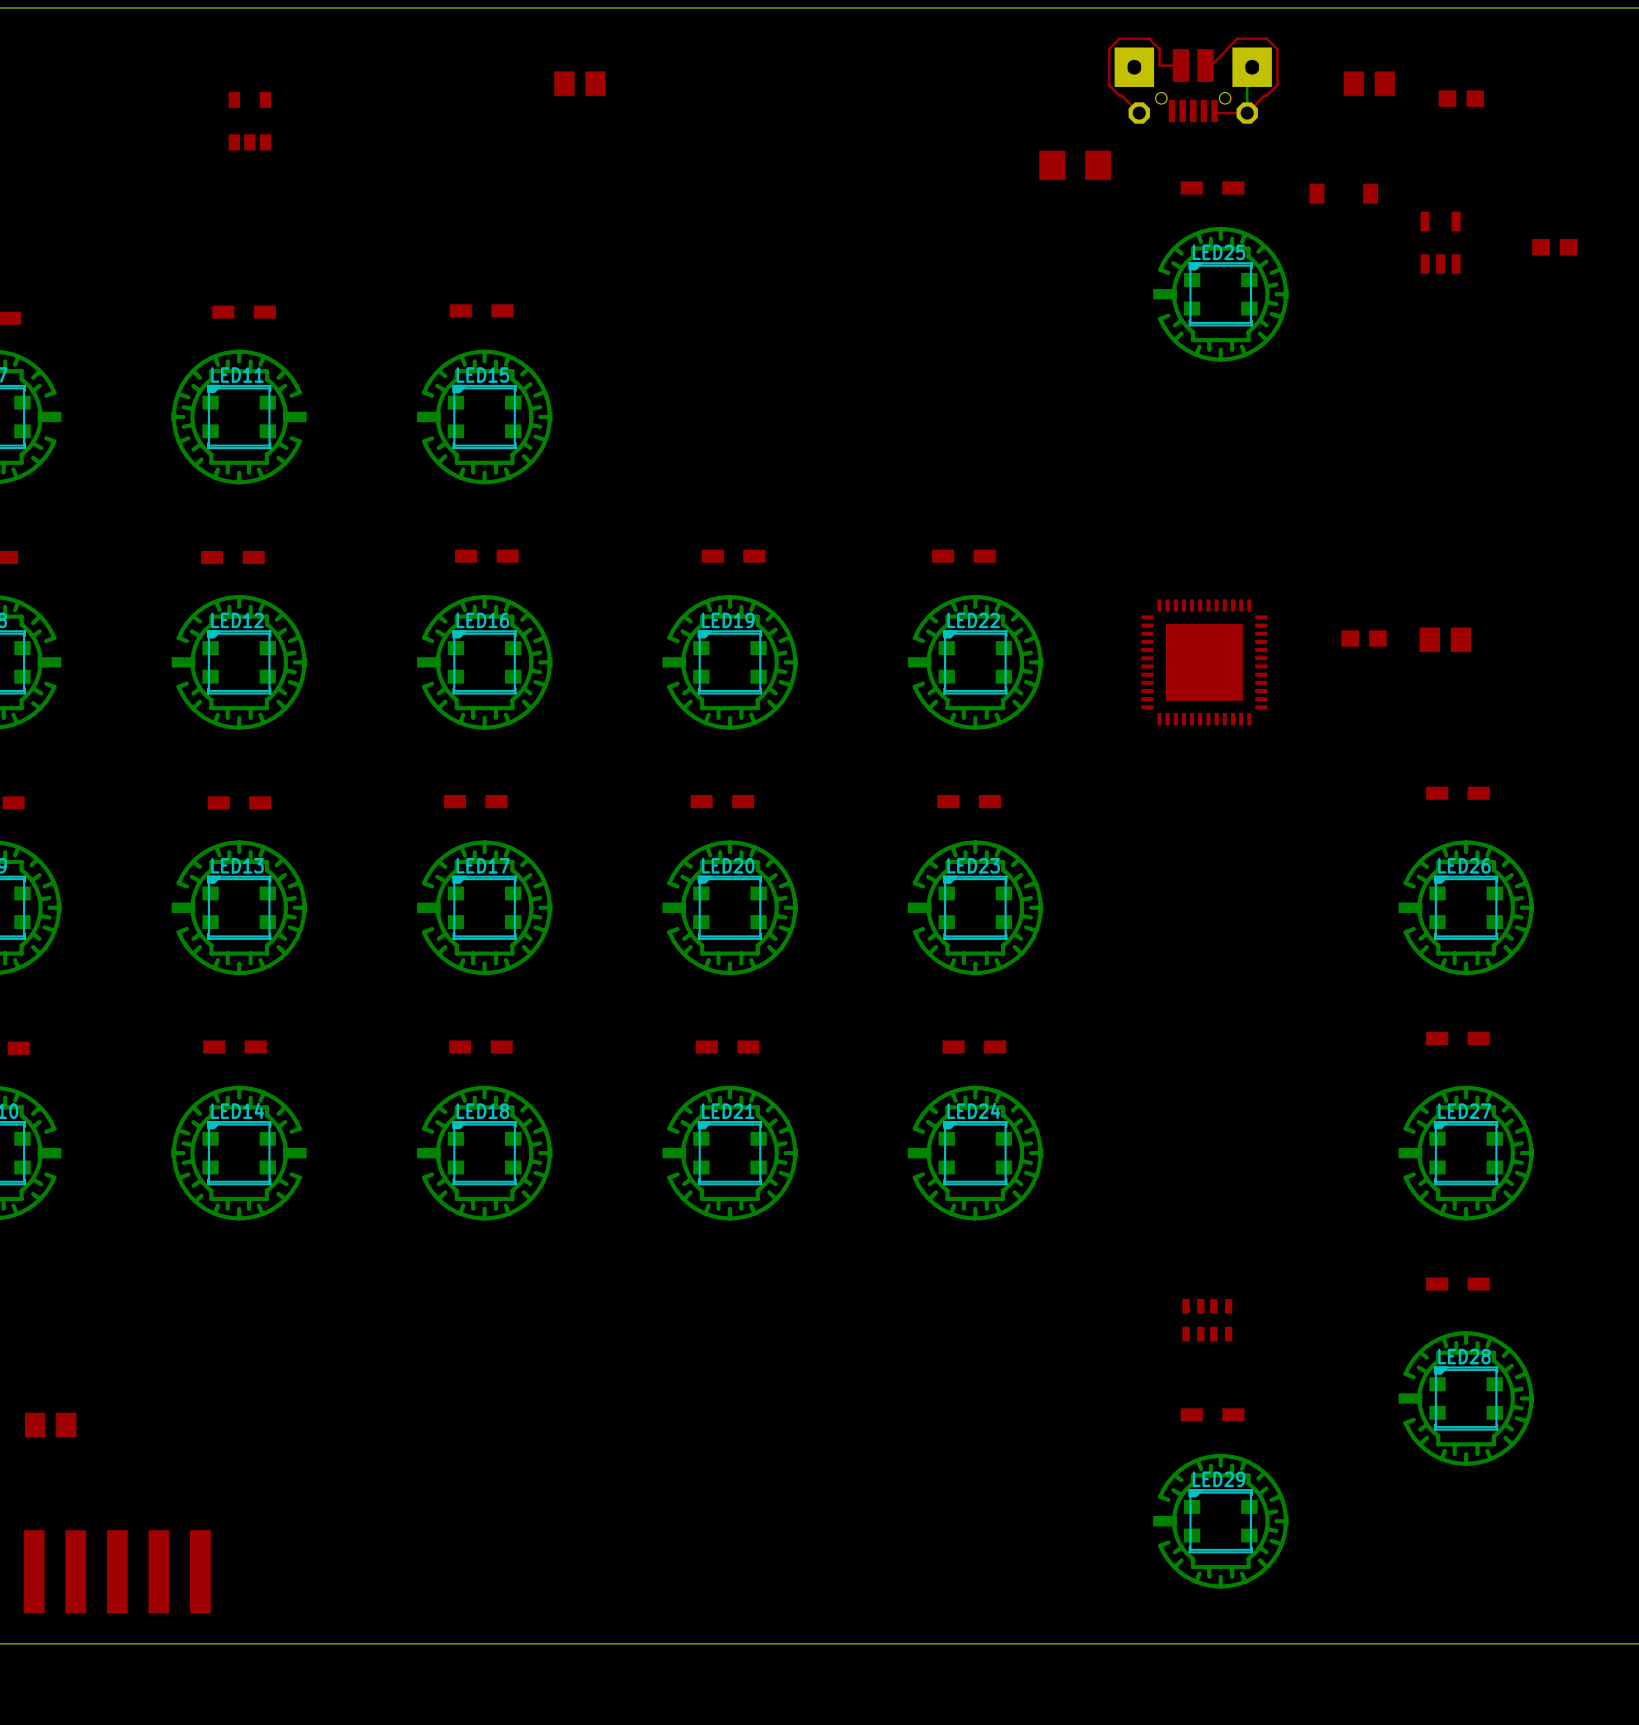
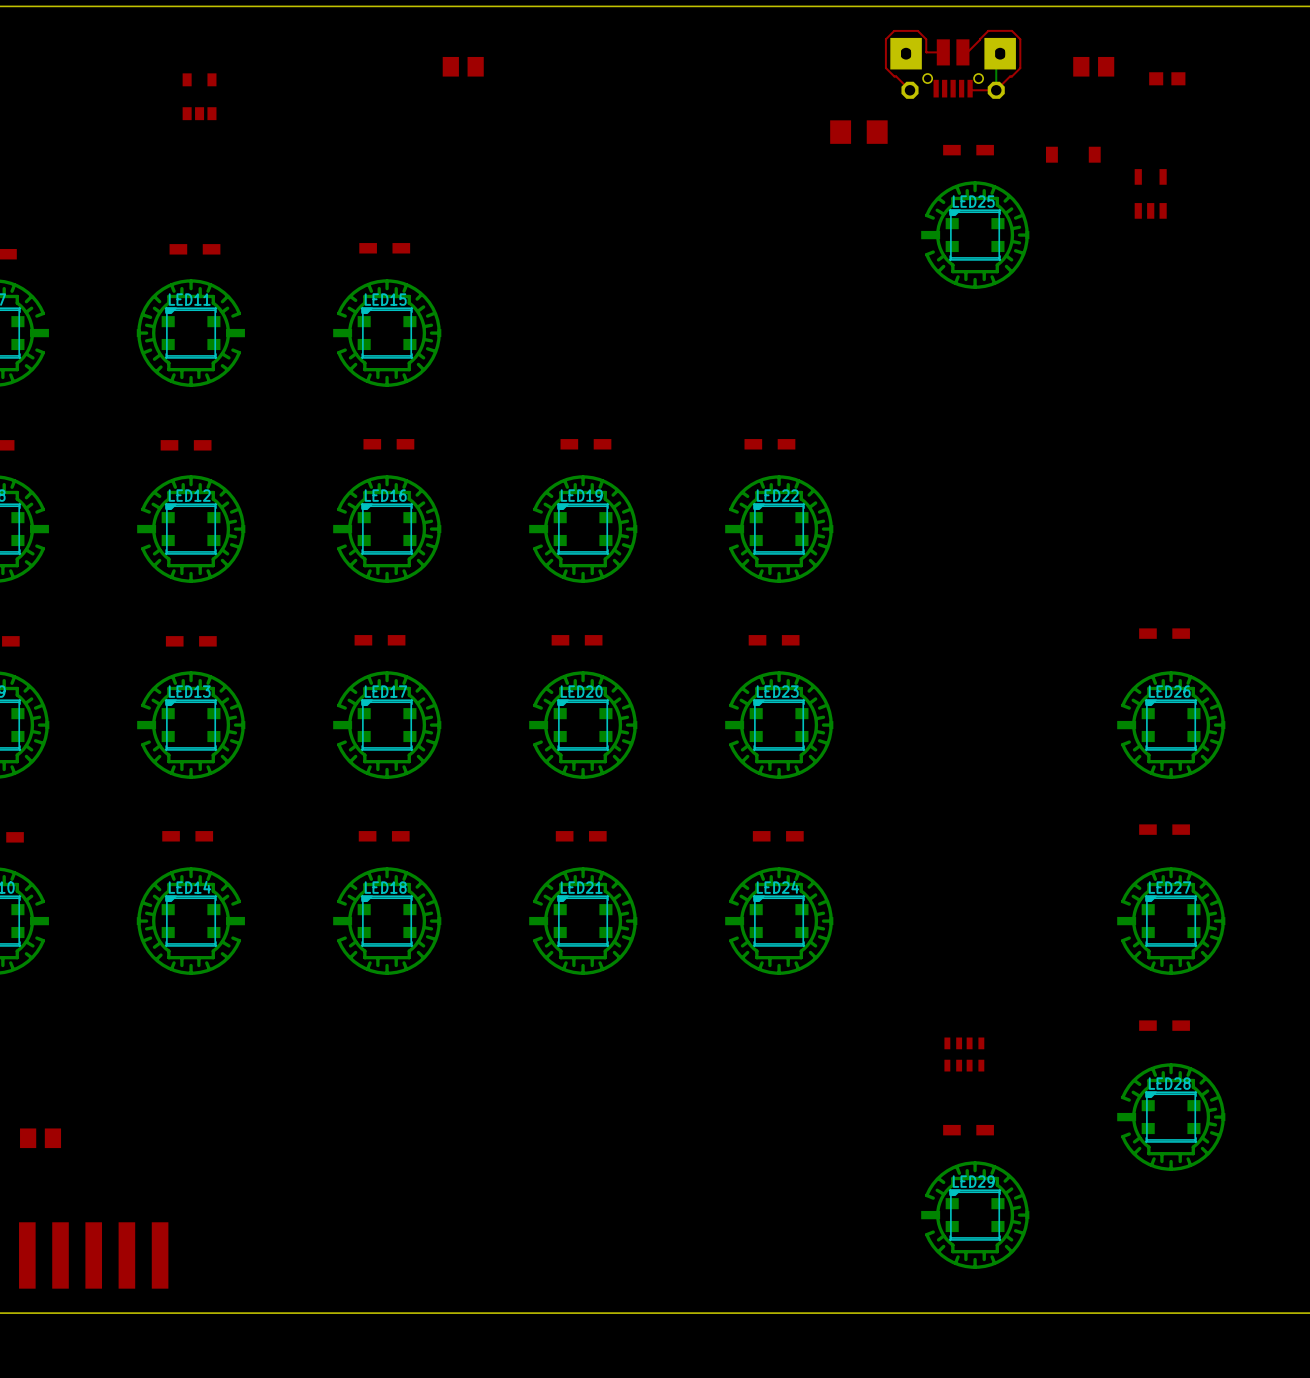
part: (1554, 247) -> none
part: (1364, 638) -> none
part: (1445, 639) -> none
part: (1204, 662) -> none

